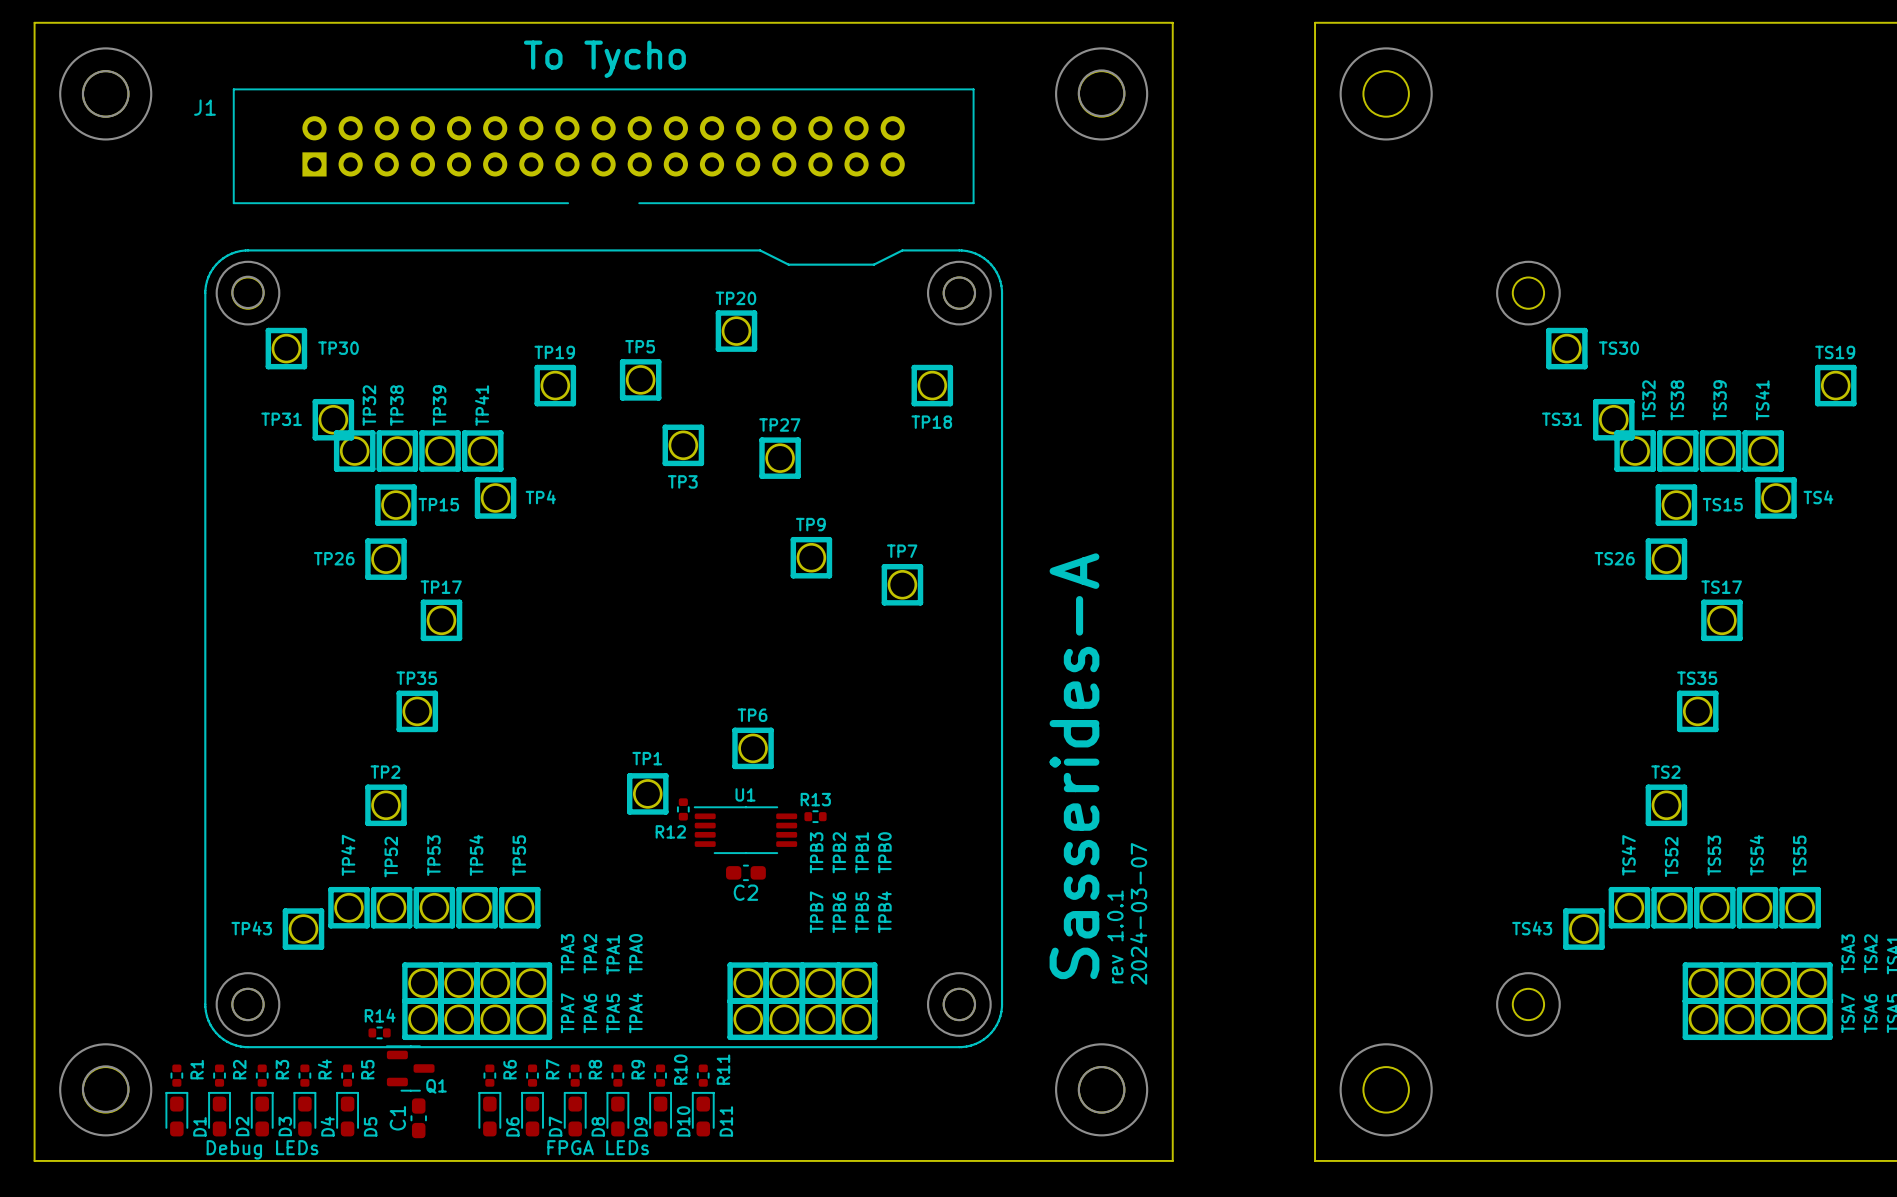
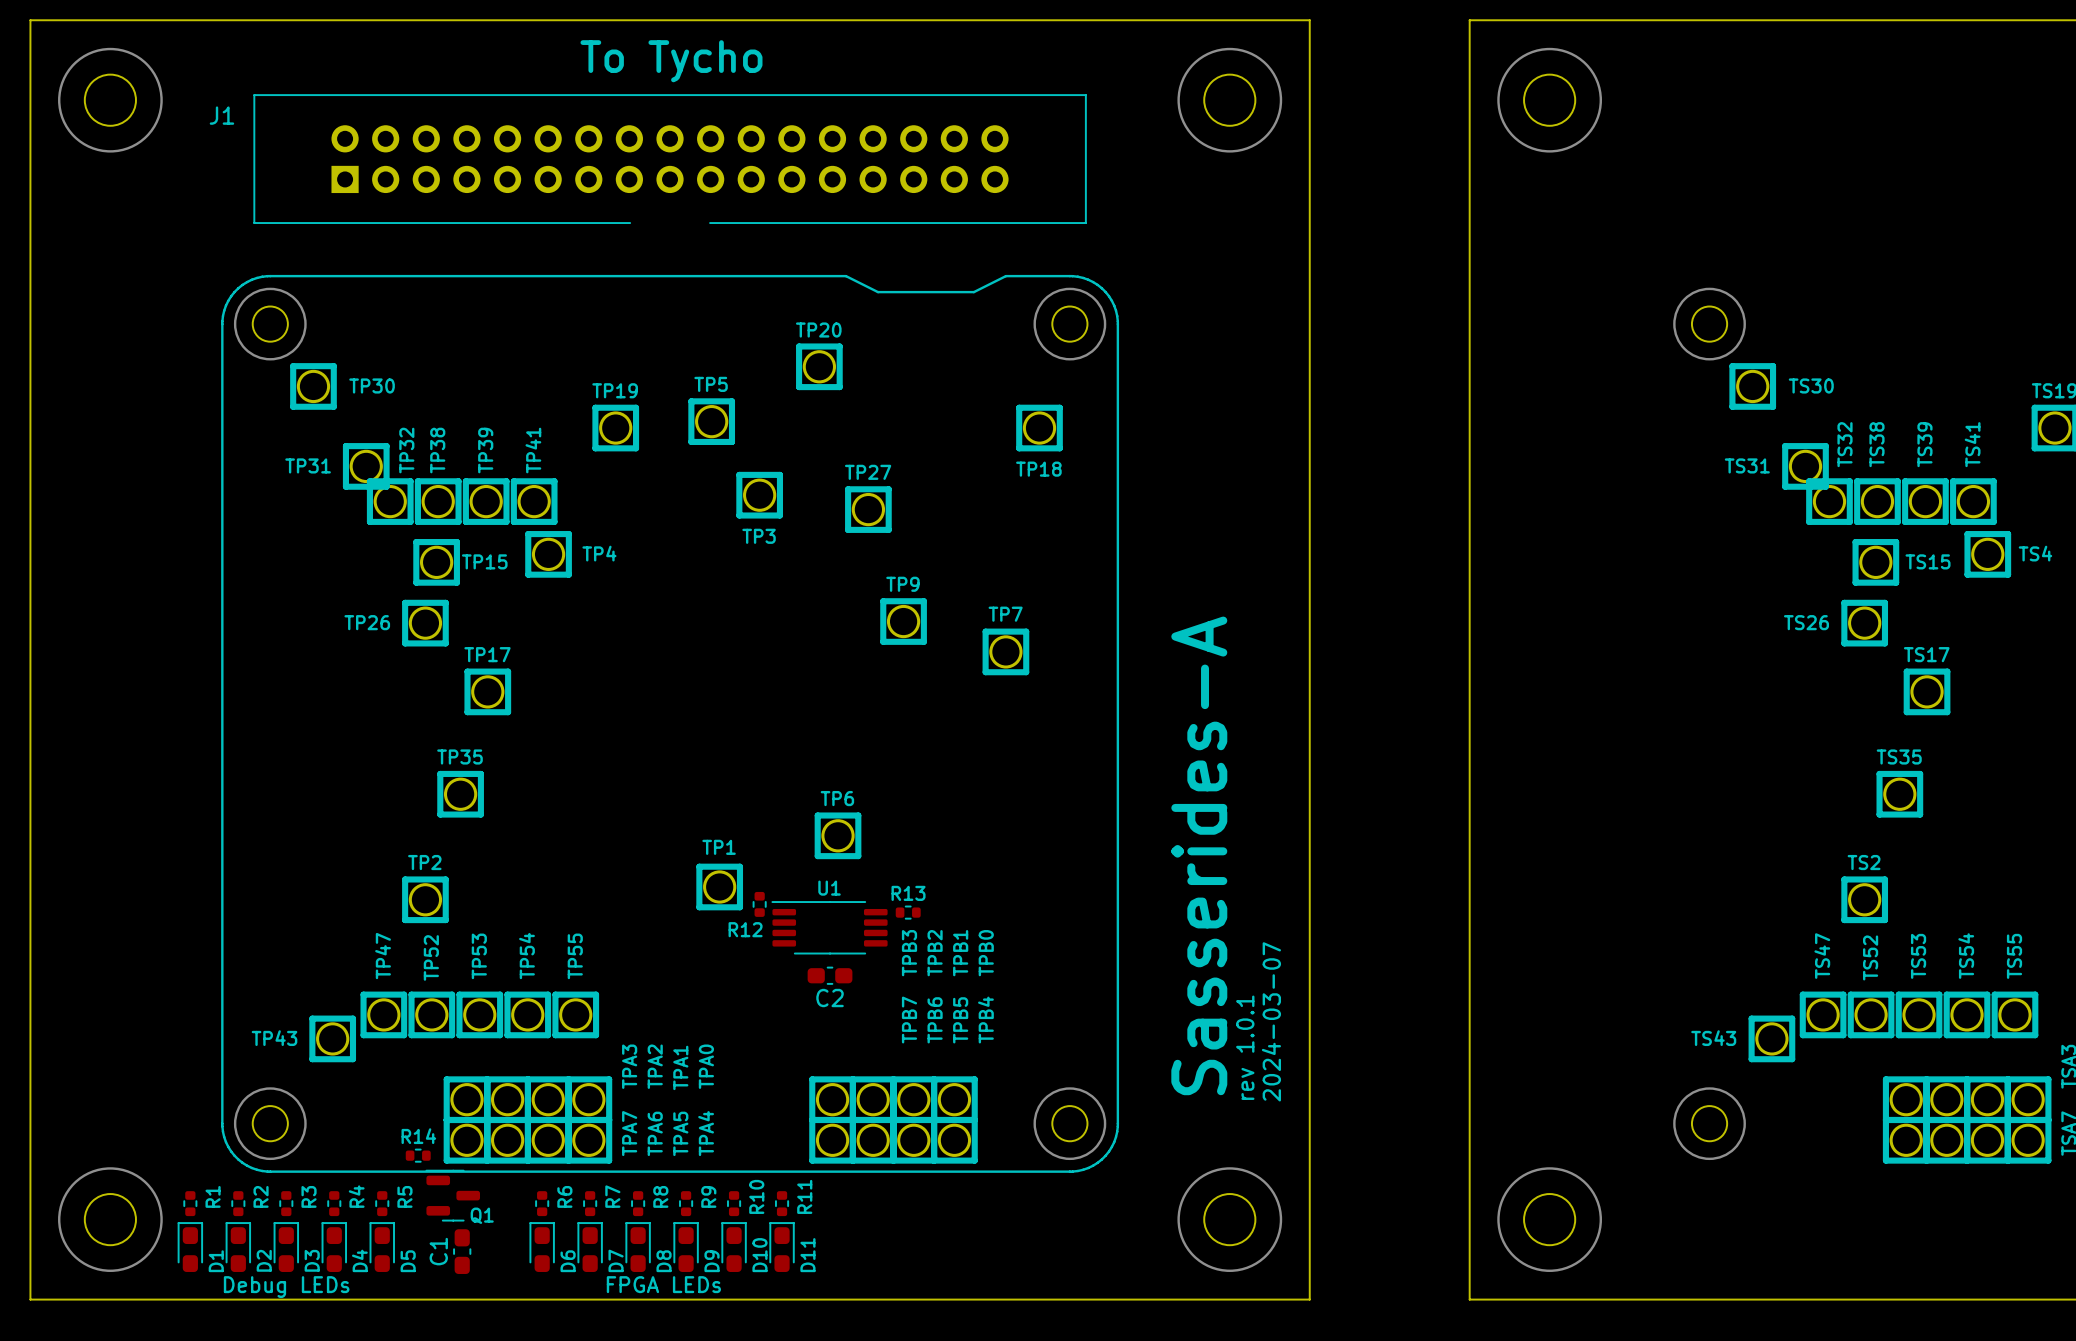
drawing: [1077, 69, 1126, 118] -> none
drawing: [81, 70, 130, 118] -> none
drawing: [231, 275, 265, 310] -> none
drawing: [942, 276, 977, 310] -> none
drawing: [231, 987, 265, 1022] -> none
drawing: [942, 987, 977, 1022] -> none
drawing: [81, 1065, 130, 1113] -> none
drawing: [1077, 1066, 1126, 1114] -> none

